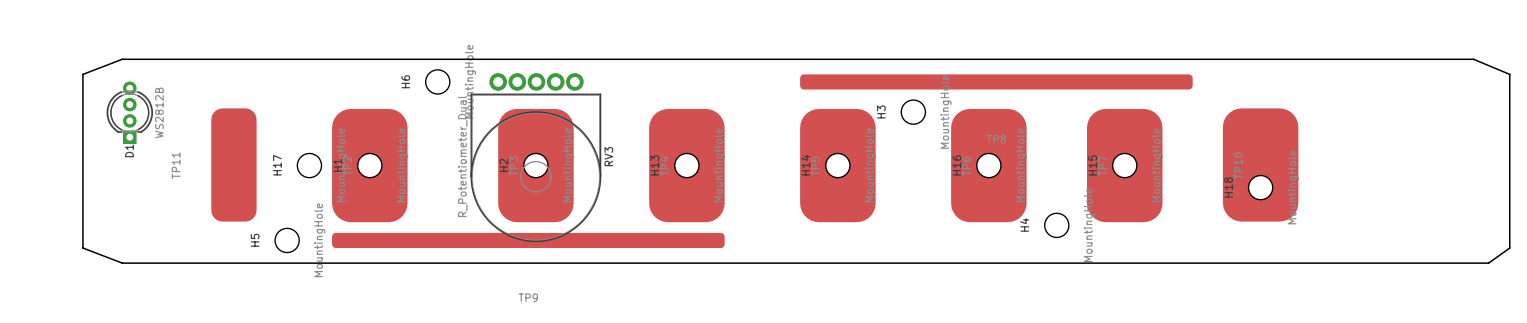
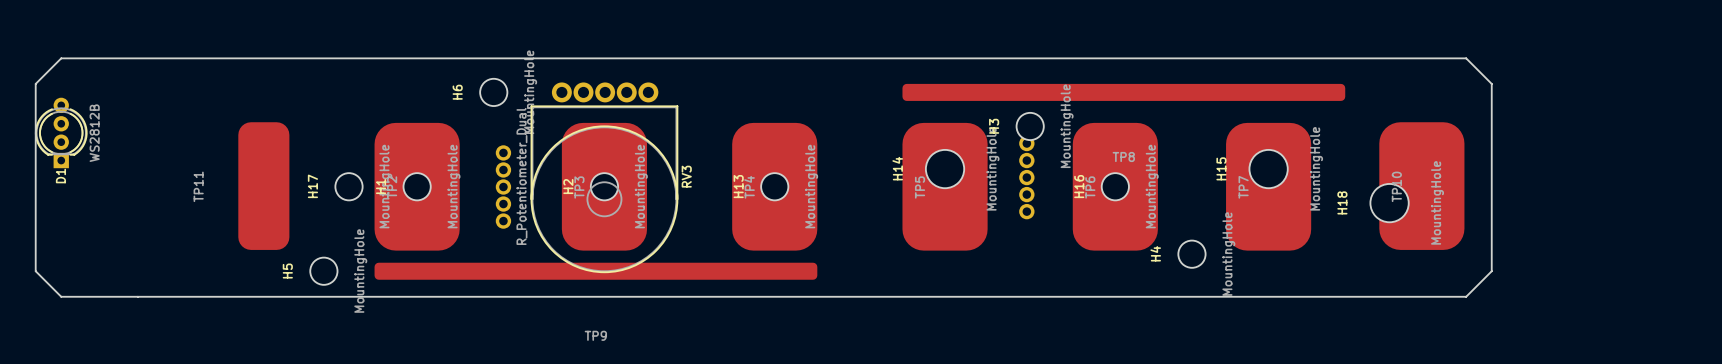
D1 position: (129, 112) -> (61, 132)
H14 footprint: [825, 153, 850, 178] -> [925, 149, 965, 189]
H15 footprint: [1112, 153, 1137, 178] -> [1249, 149, 1288, 189]
part: none -> (1026, 177)
part: none -> (503, 187)
H18 footprint: [1248, 175, 1273, 200] -> [1370, 183, 1409, 223]
board edge: (122, 263) (82, 248) (82, 74) (122, 59) (1473, 59) (1509, 74) (1509, 248) (1488, 263) (1299, 263) -> (137, 296) (61, 296) (35, 271) (35, 83) (61, 58) (1466, 58) (1491, 83) (1491, 271) (1466, 296)

